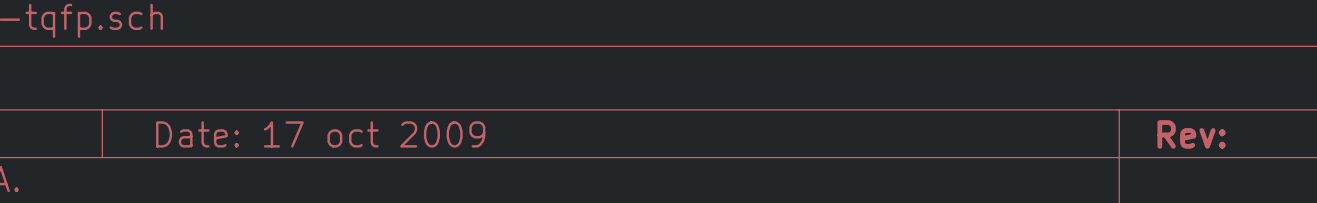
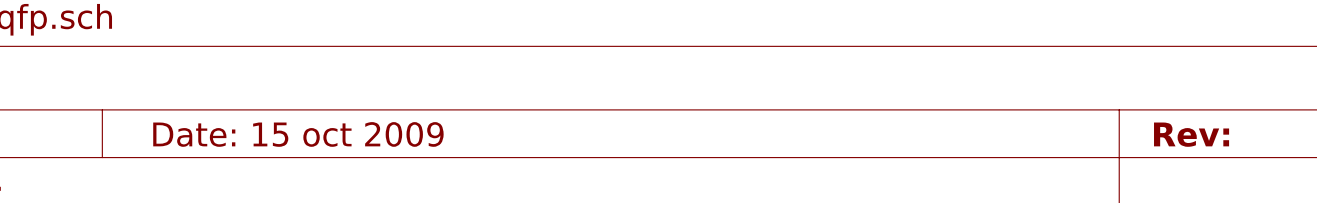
title block: Date: 17 oct 2009 (320, 134) -> Date: 15 oct 2009 (298, 134)

